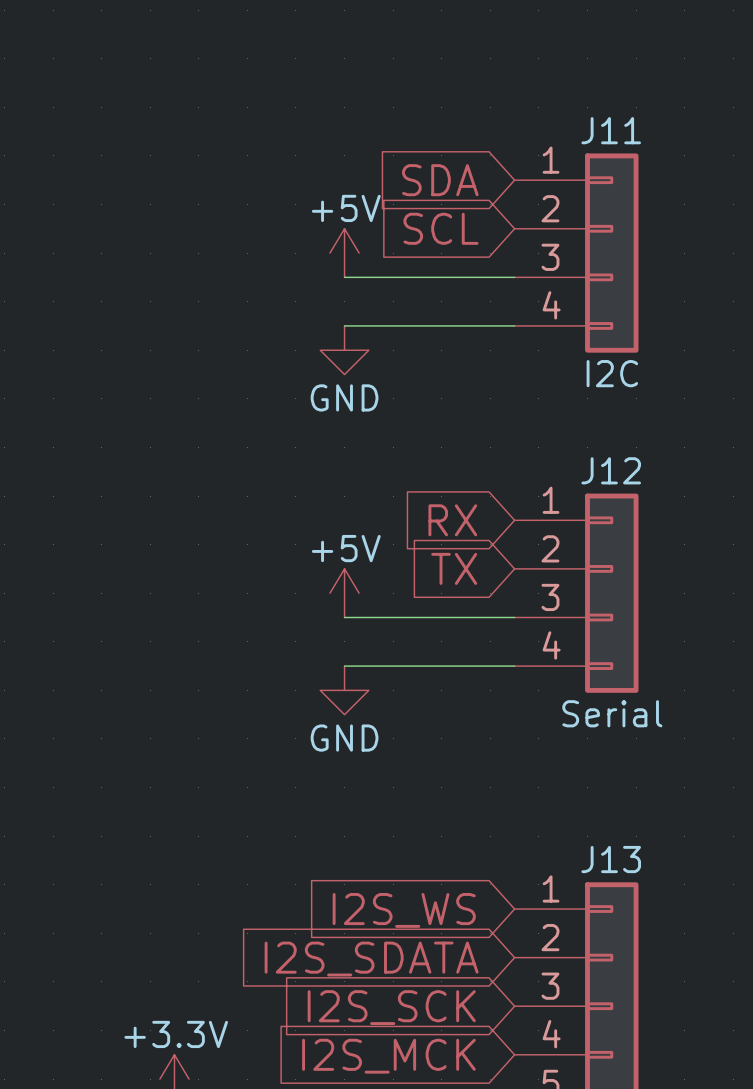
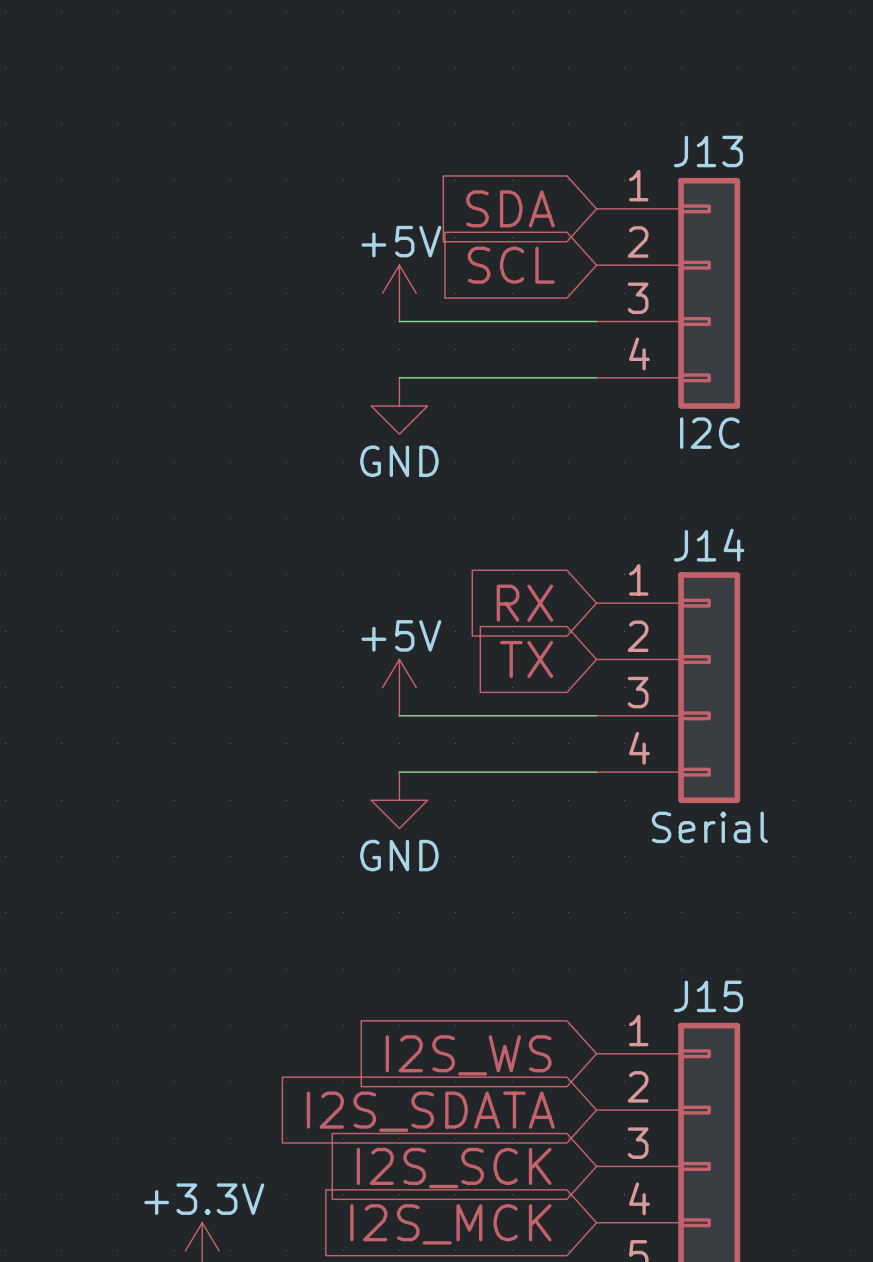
J11 name: J11 (611, 130) -> J13 (708, 151)
J12 name: J12 (611, 470) -> J14 (709, 545)
J13 name: J13 (611, 859) -> J15 (708, 996)

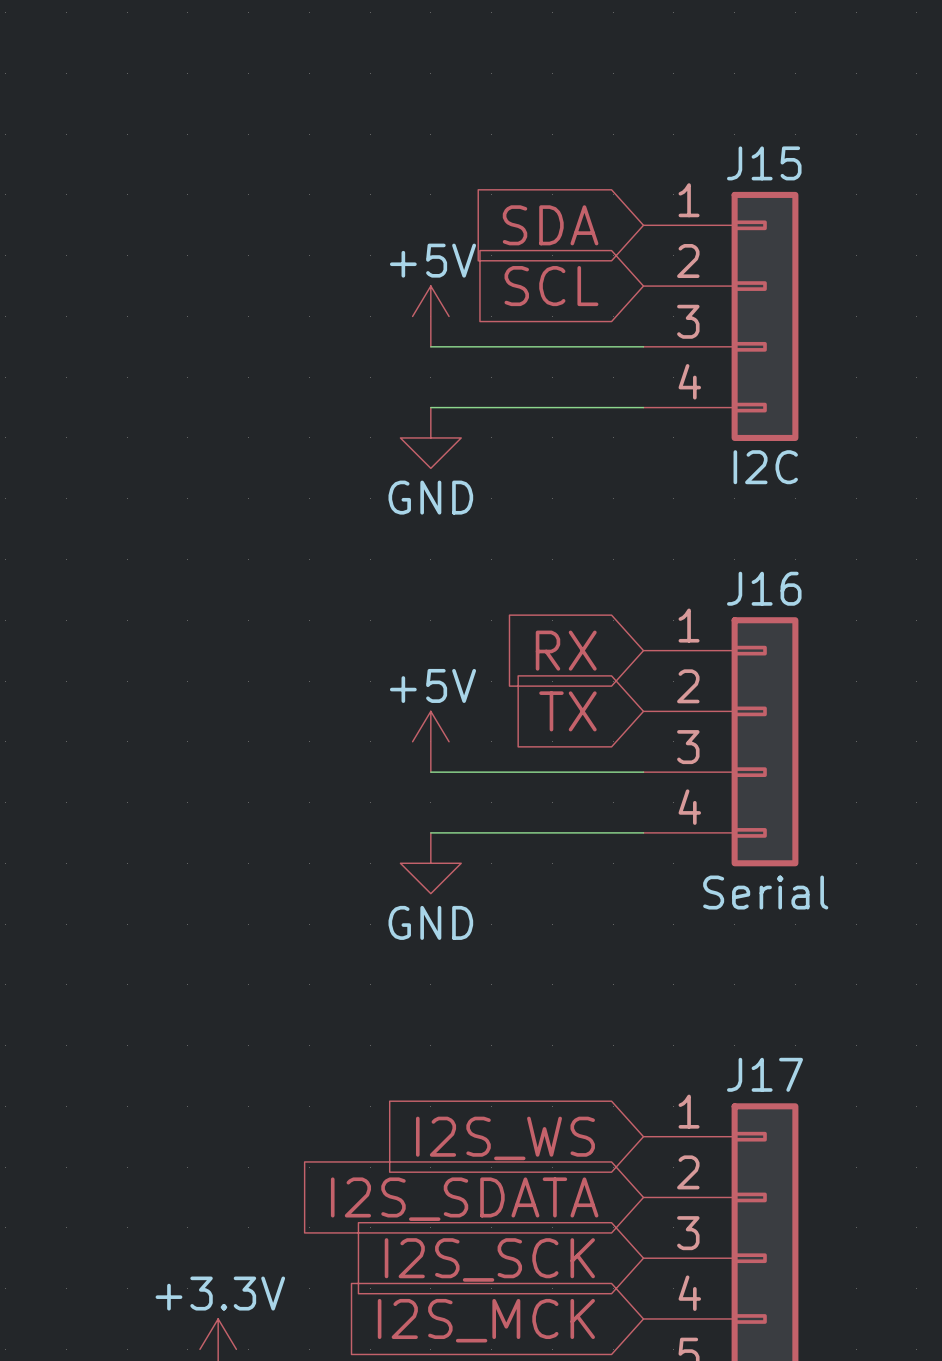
J13 name: J13 (708, 151) -> J15 (764, 163)
J14 name: J14 (709, 545) -> J16 (764, 588)
J15 name: J15 (708, 996) -> J17 (765, 1074)

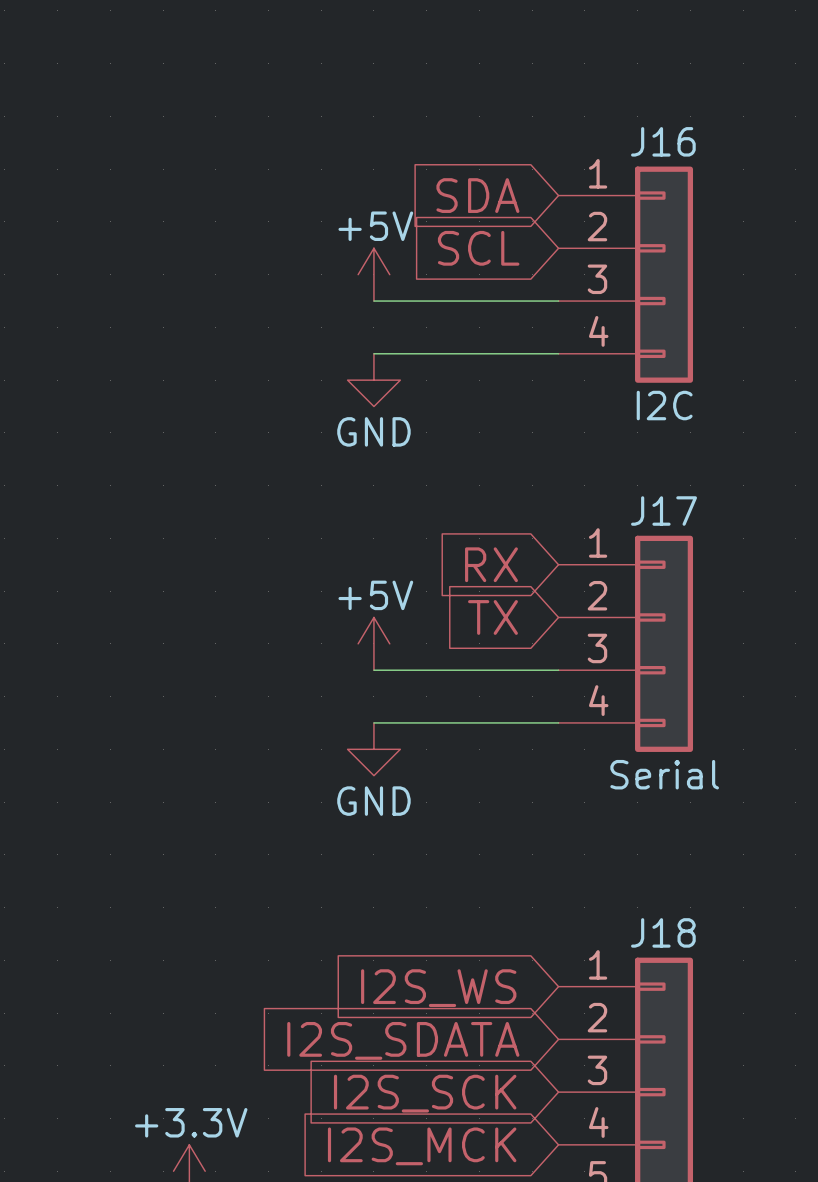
J15 name: J15 (764, 163) -> J16 (663, 141)
J16 name: J16 (764, 588) -> J17 (664, 511)
J17 name: J17 (765, 1074) -> J18 (663, 932)

